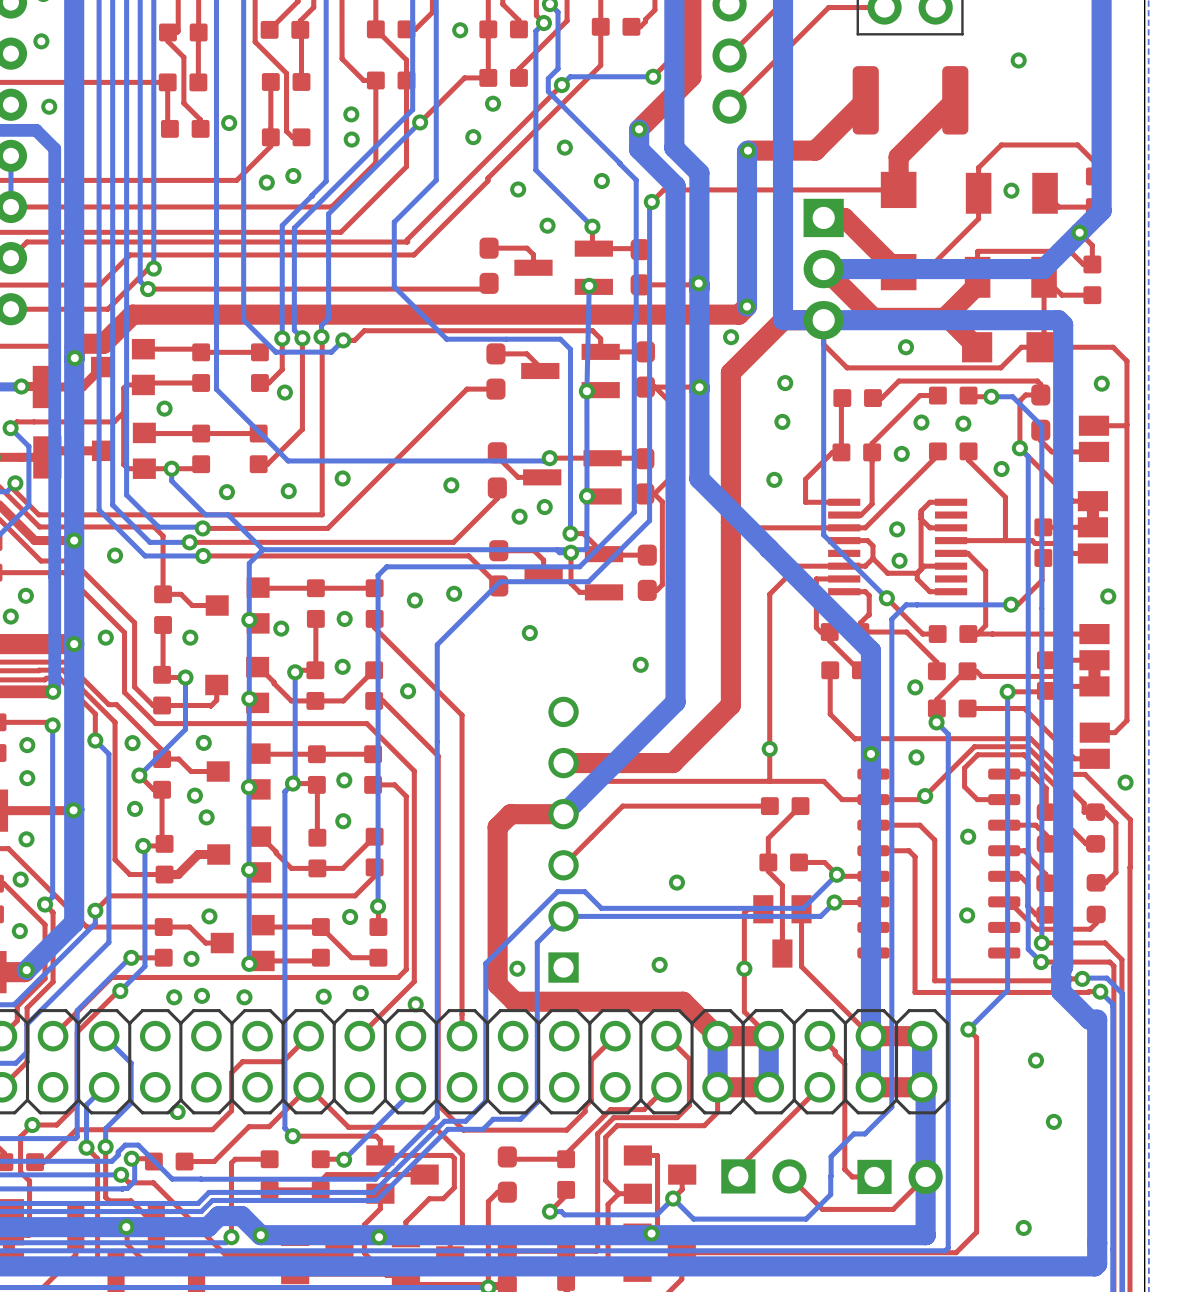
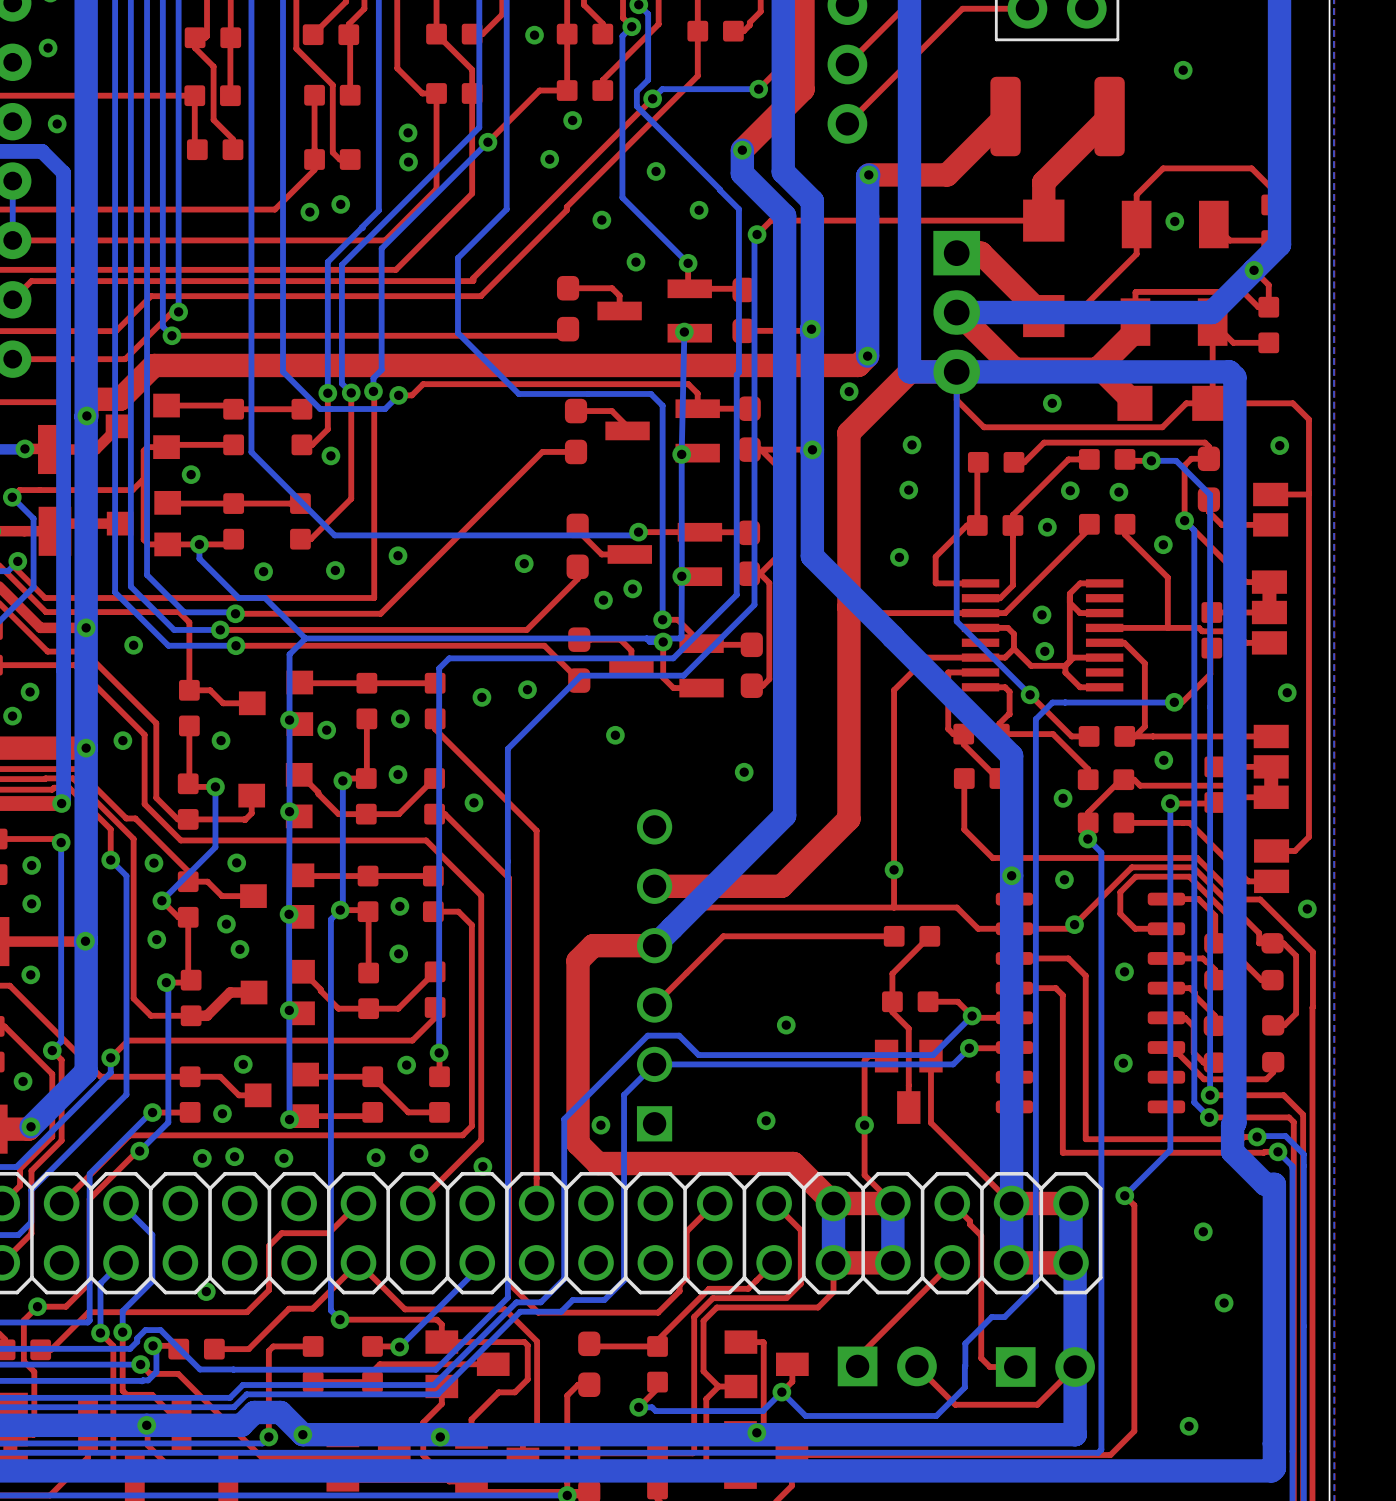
via: (229, 123) -> none
via: none -> (1163, 760)
via: (20, 879) -> none

